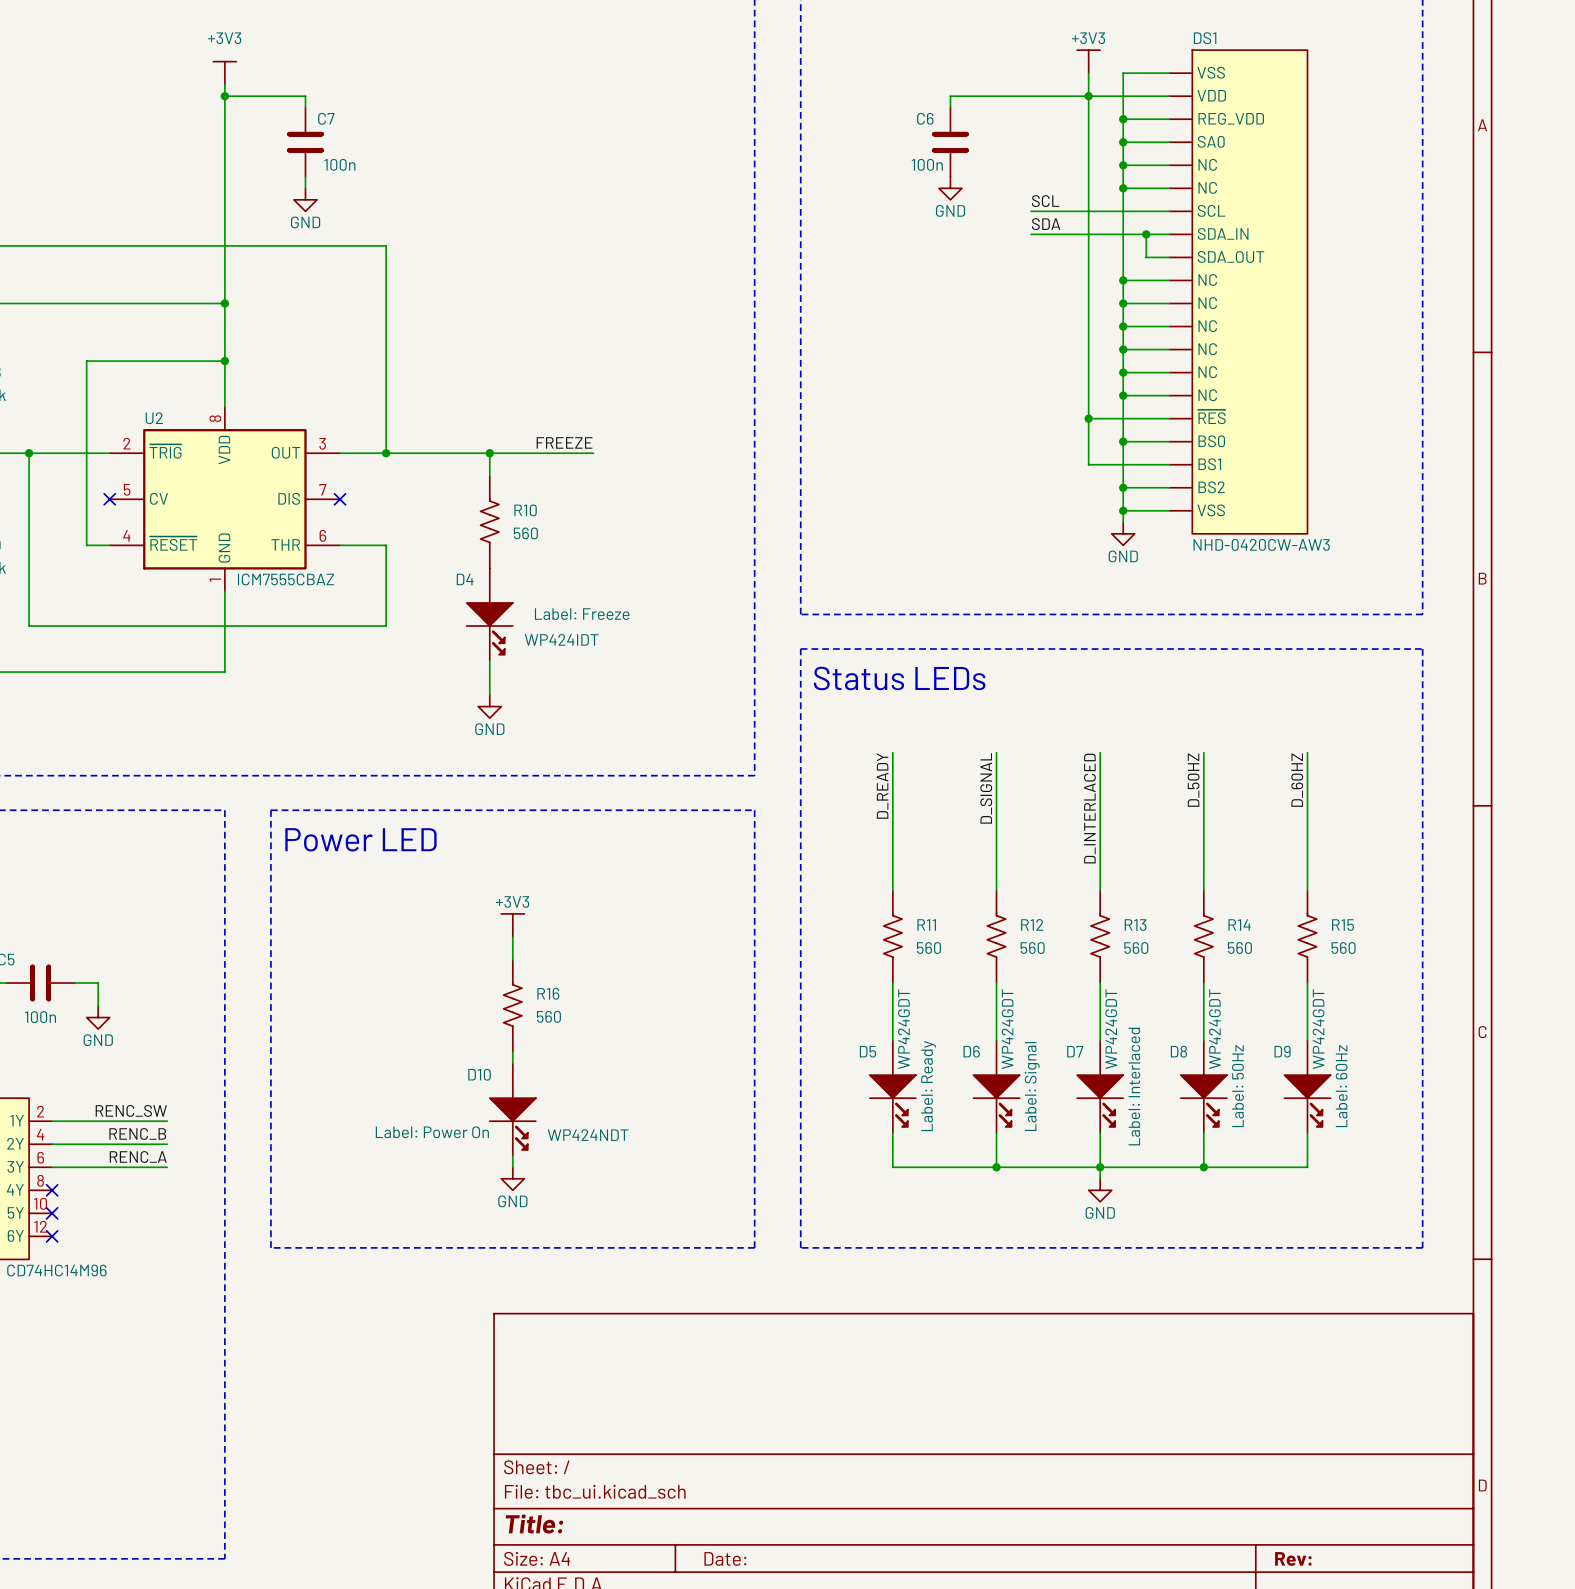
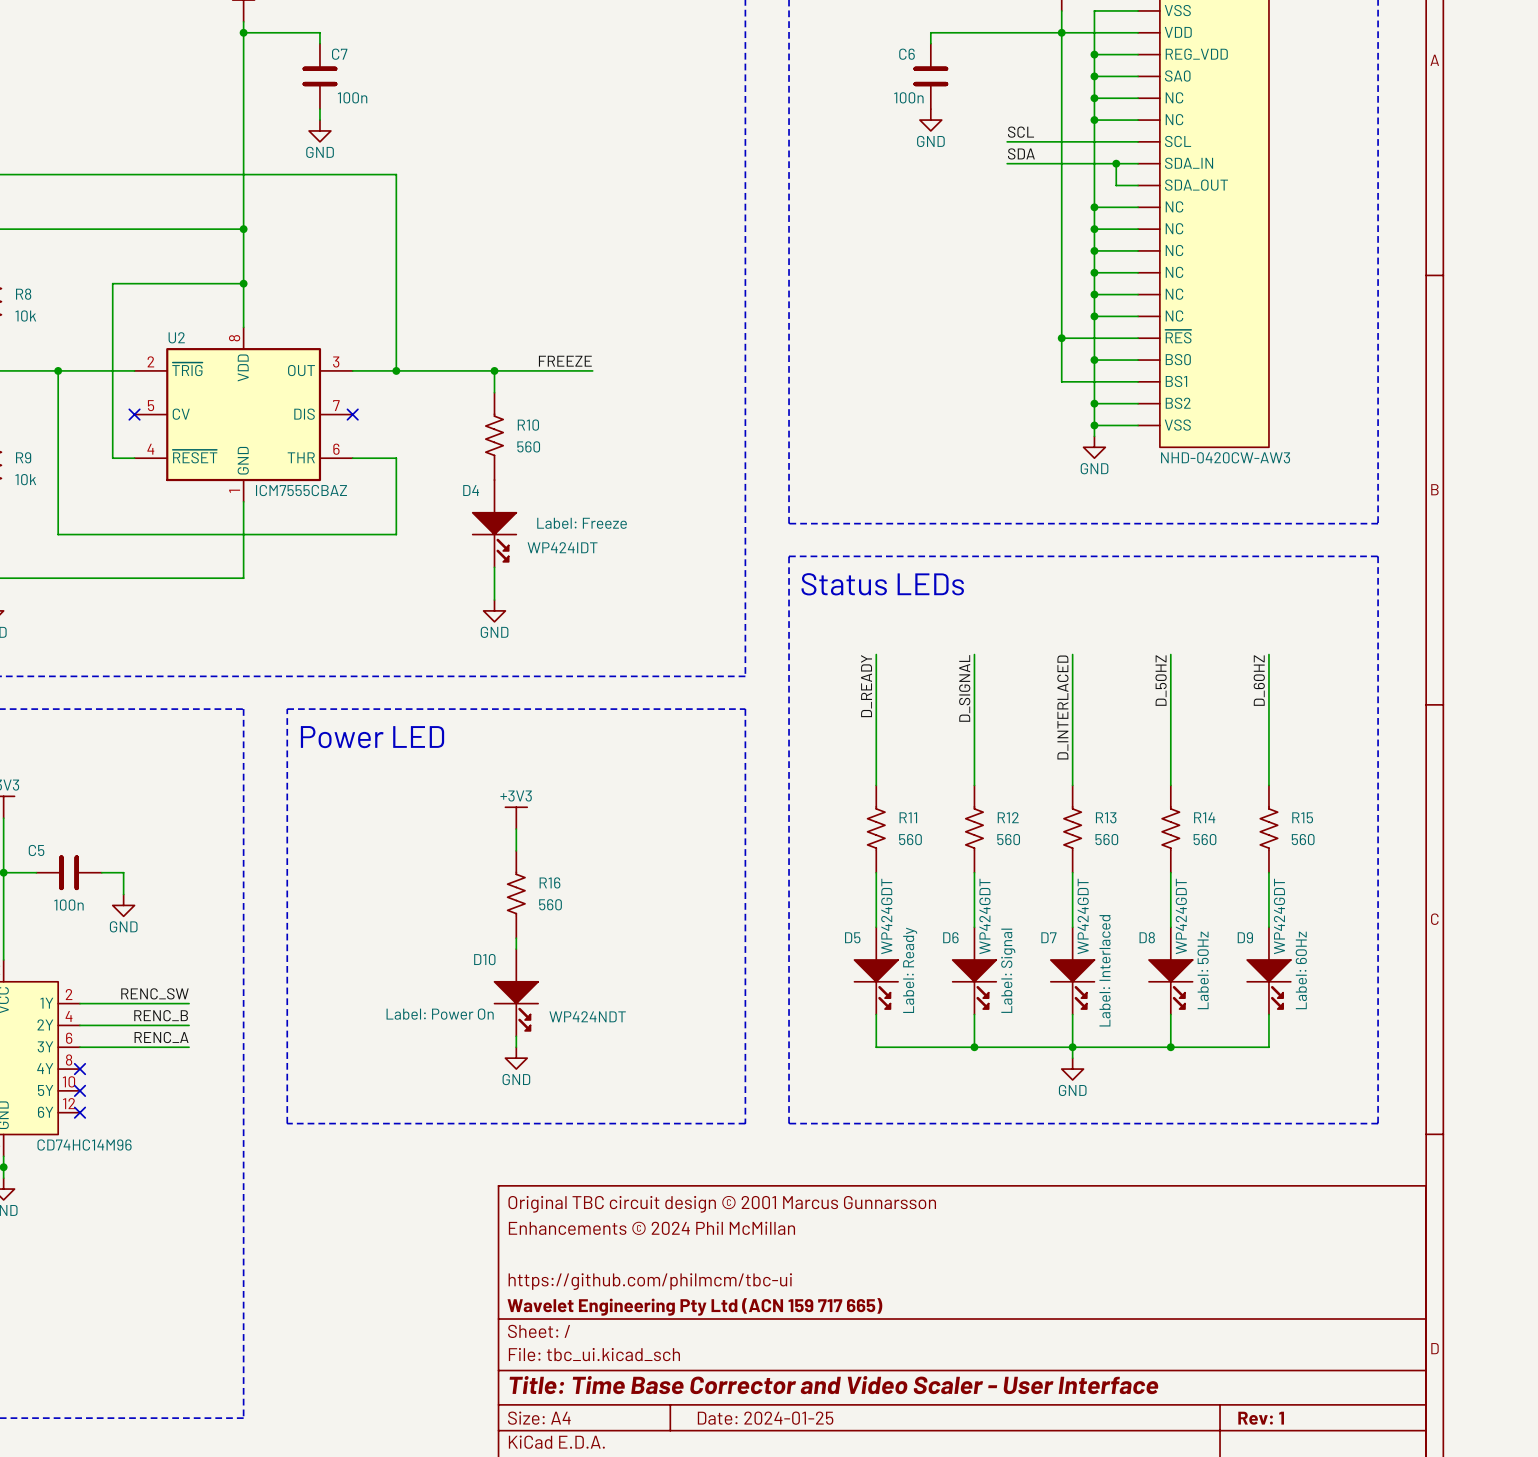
title block: none -> Original TBC circuit design © 2001 Marcus Gunnarsson (722, 1204)
title block: none -> Enhancements © 2024 Phil McMillan (651, 1228)
title block: none -> https://github.com/philmcm/tbc-ui (650, 1281)
title block: none -> Wavelet Engineering Pty Ltd (ACN 159 717 665) (694, 1306)
title block: Title: (534, 1523) -> Title: Time Base Corrector and Video Scaler - User Interface (833, 1385)
title block: Date: (725, 1558) -> Date: 2024-01-25 (765, 1418)
title block: Rev: (1293, 1558) -> Rev: 1 (1261, 1418)

